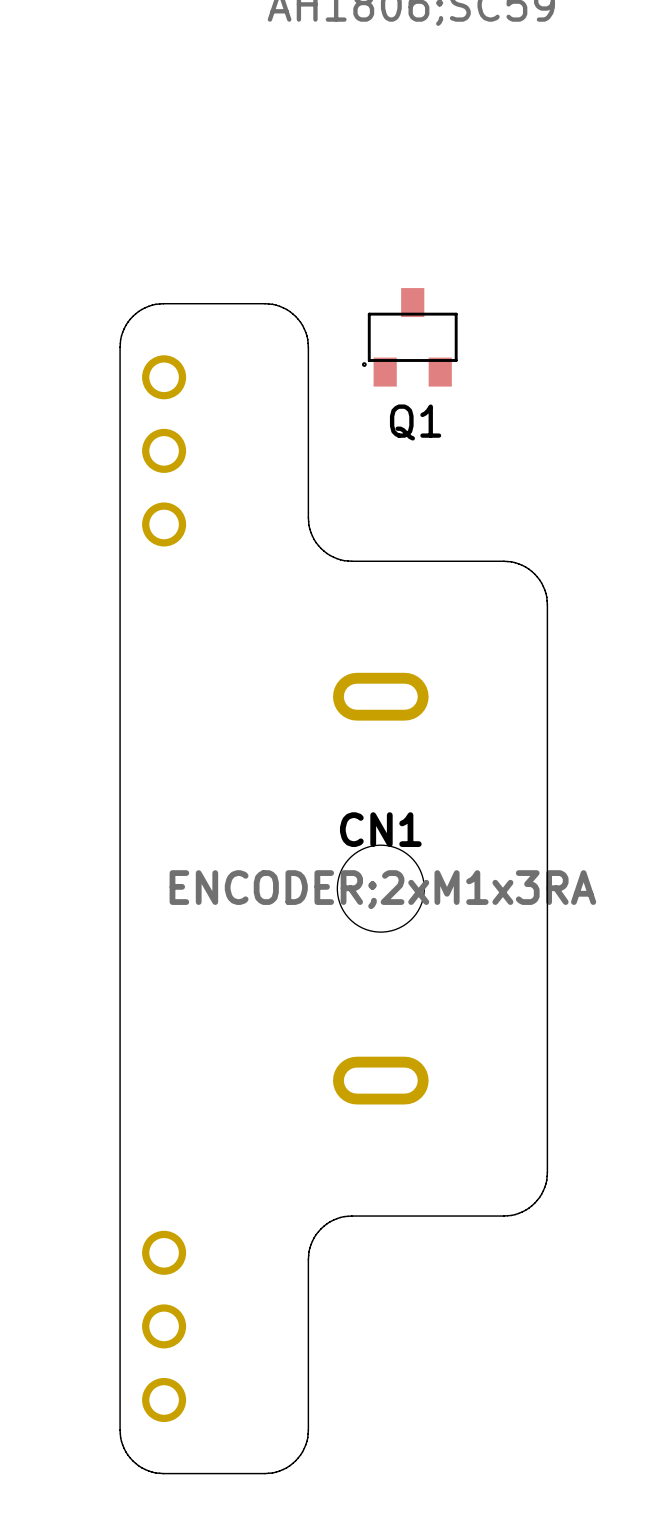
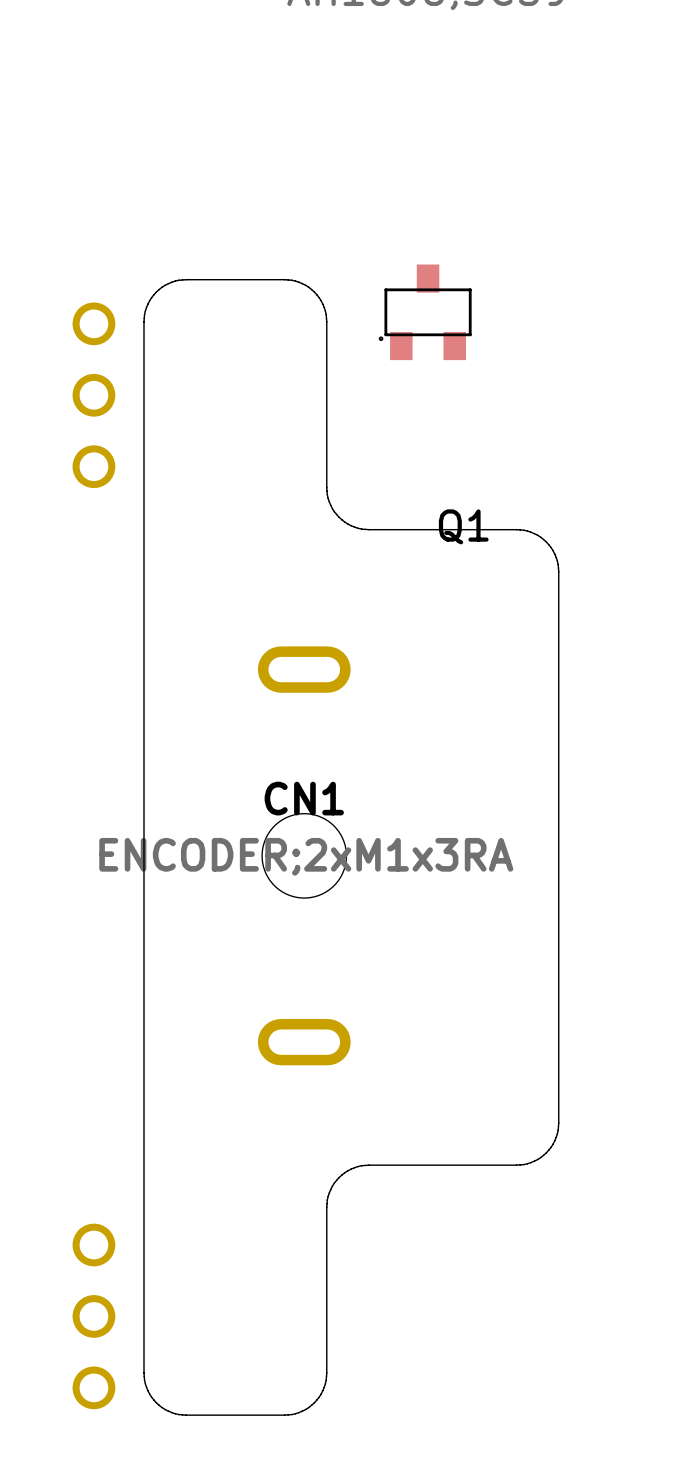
CN1 footprint: [142, 355, 429, 1423] -> [72, 302, 351, 1410]
Q1 name position: Q1 (415, 422) -> Q1 (463, 526)

